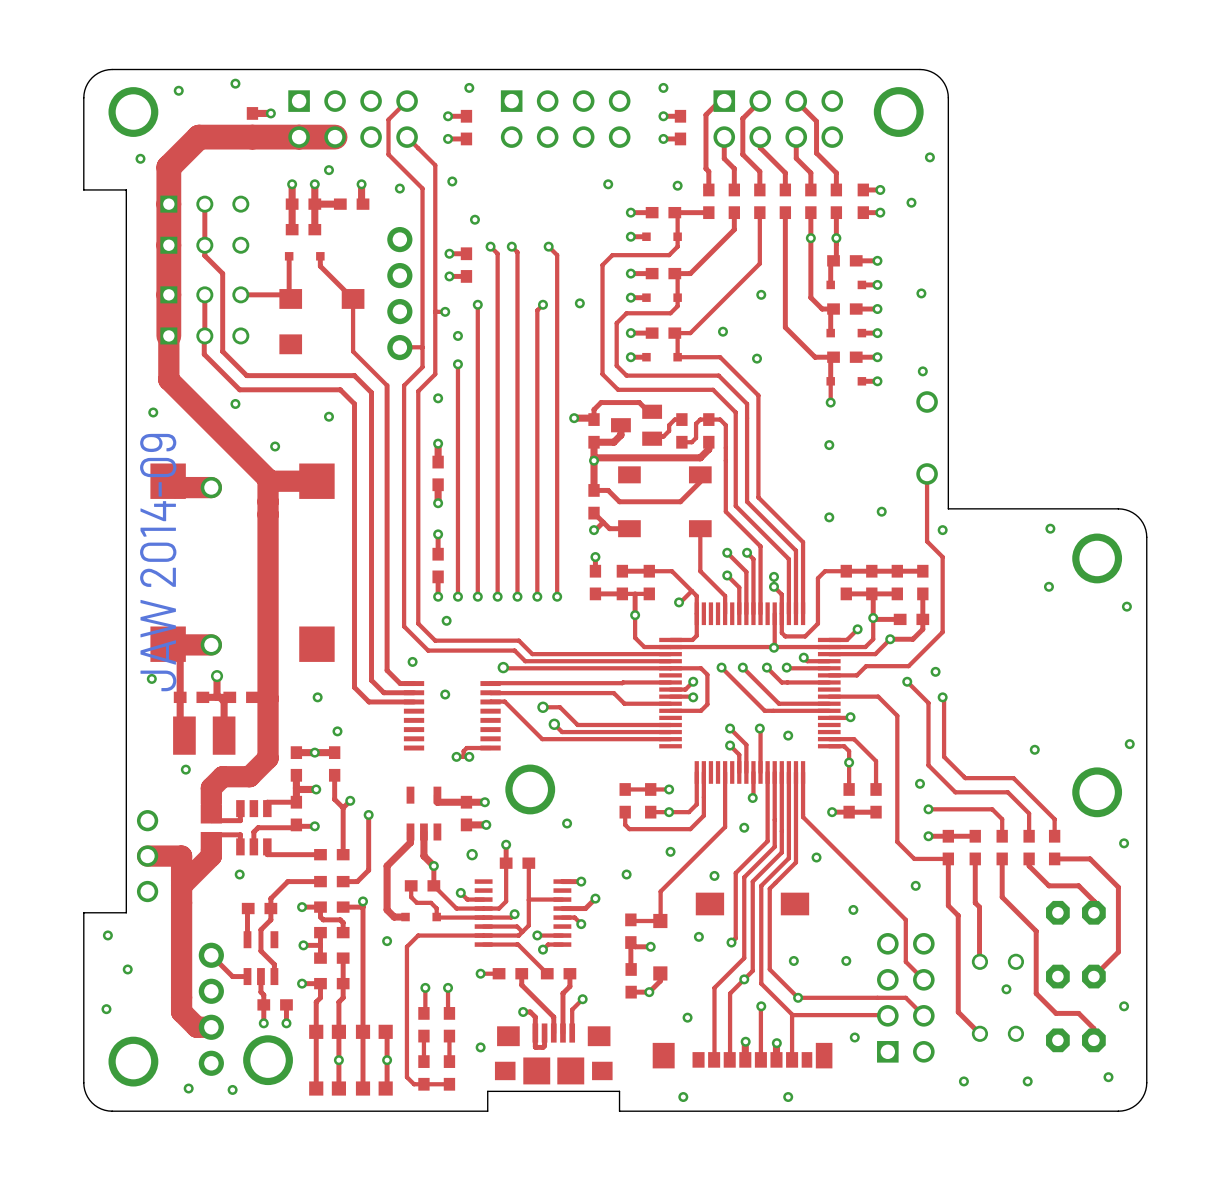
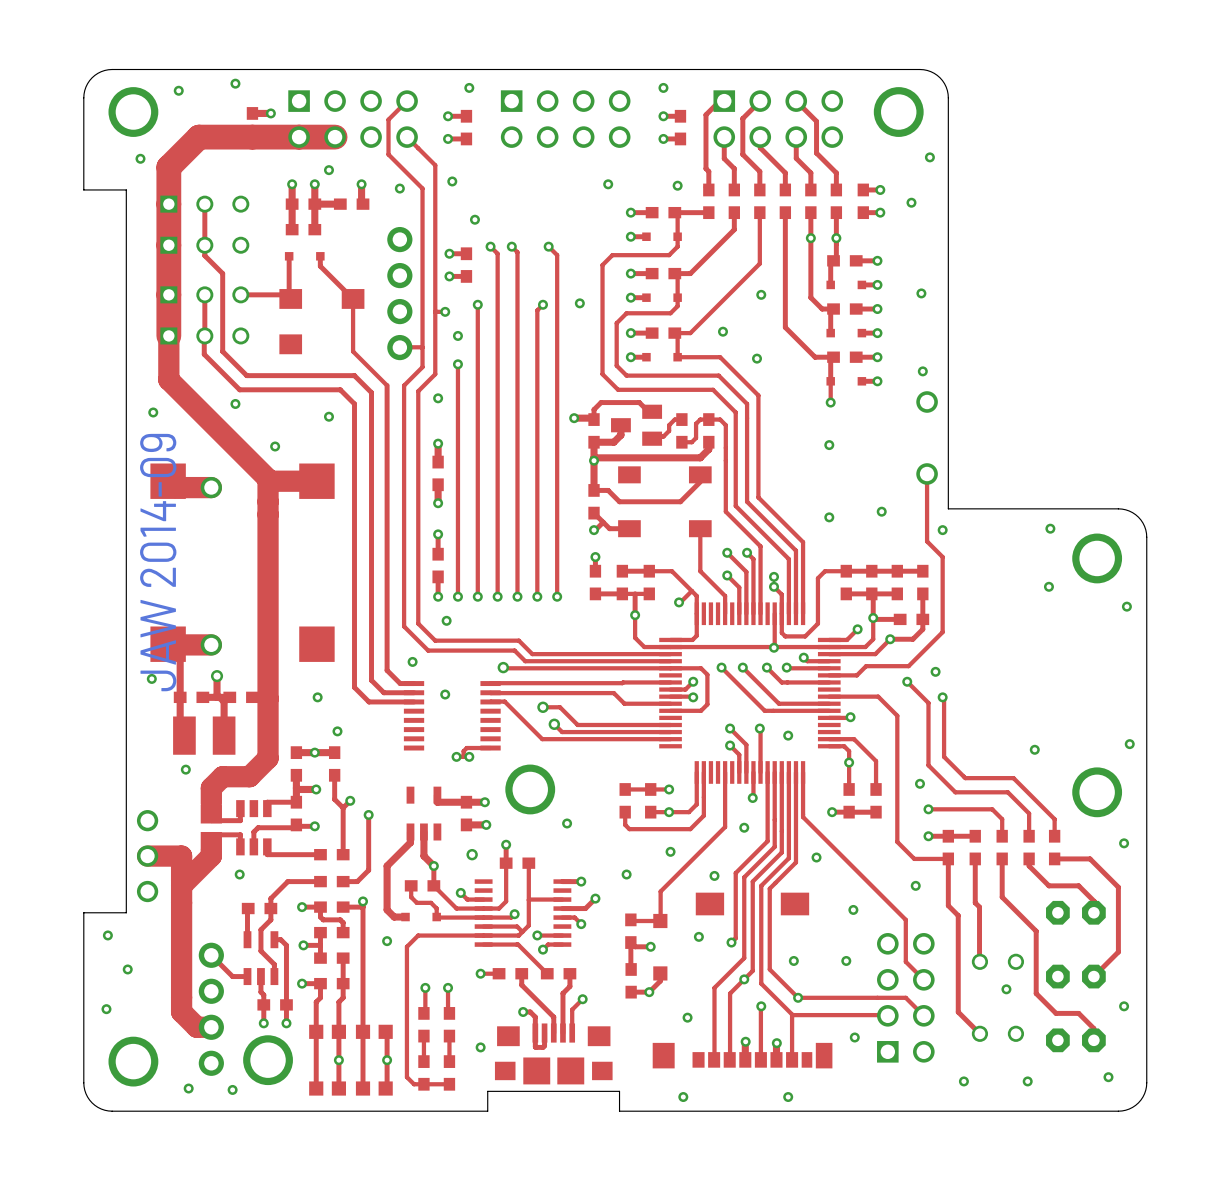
top track: none -> (274, 939) (280, 939) (286, 945) (286, 1004)

